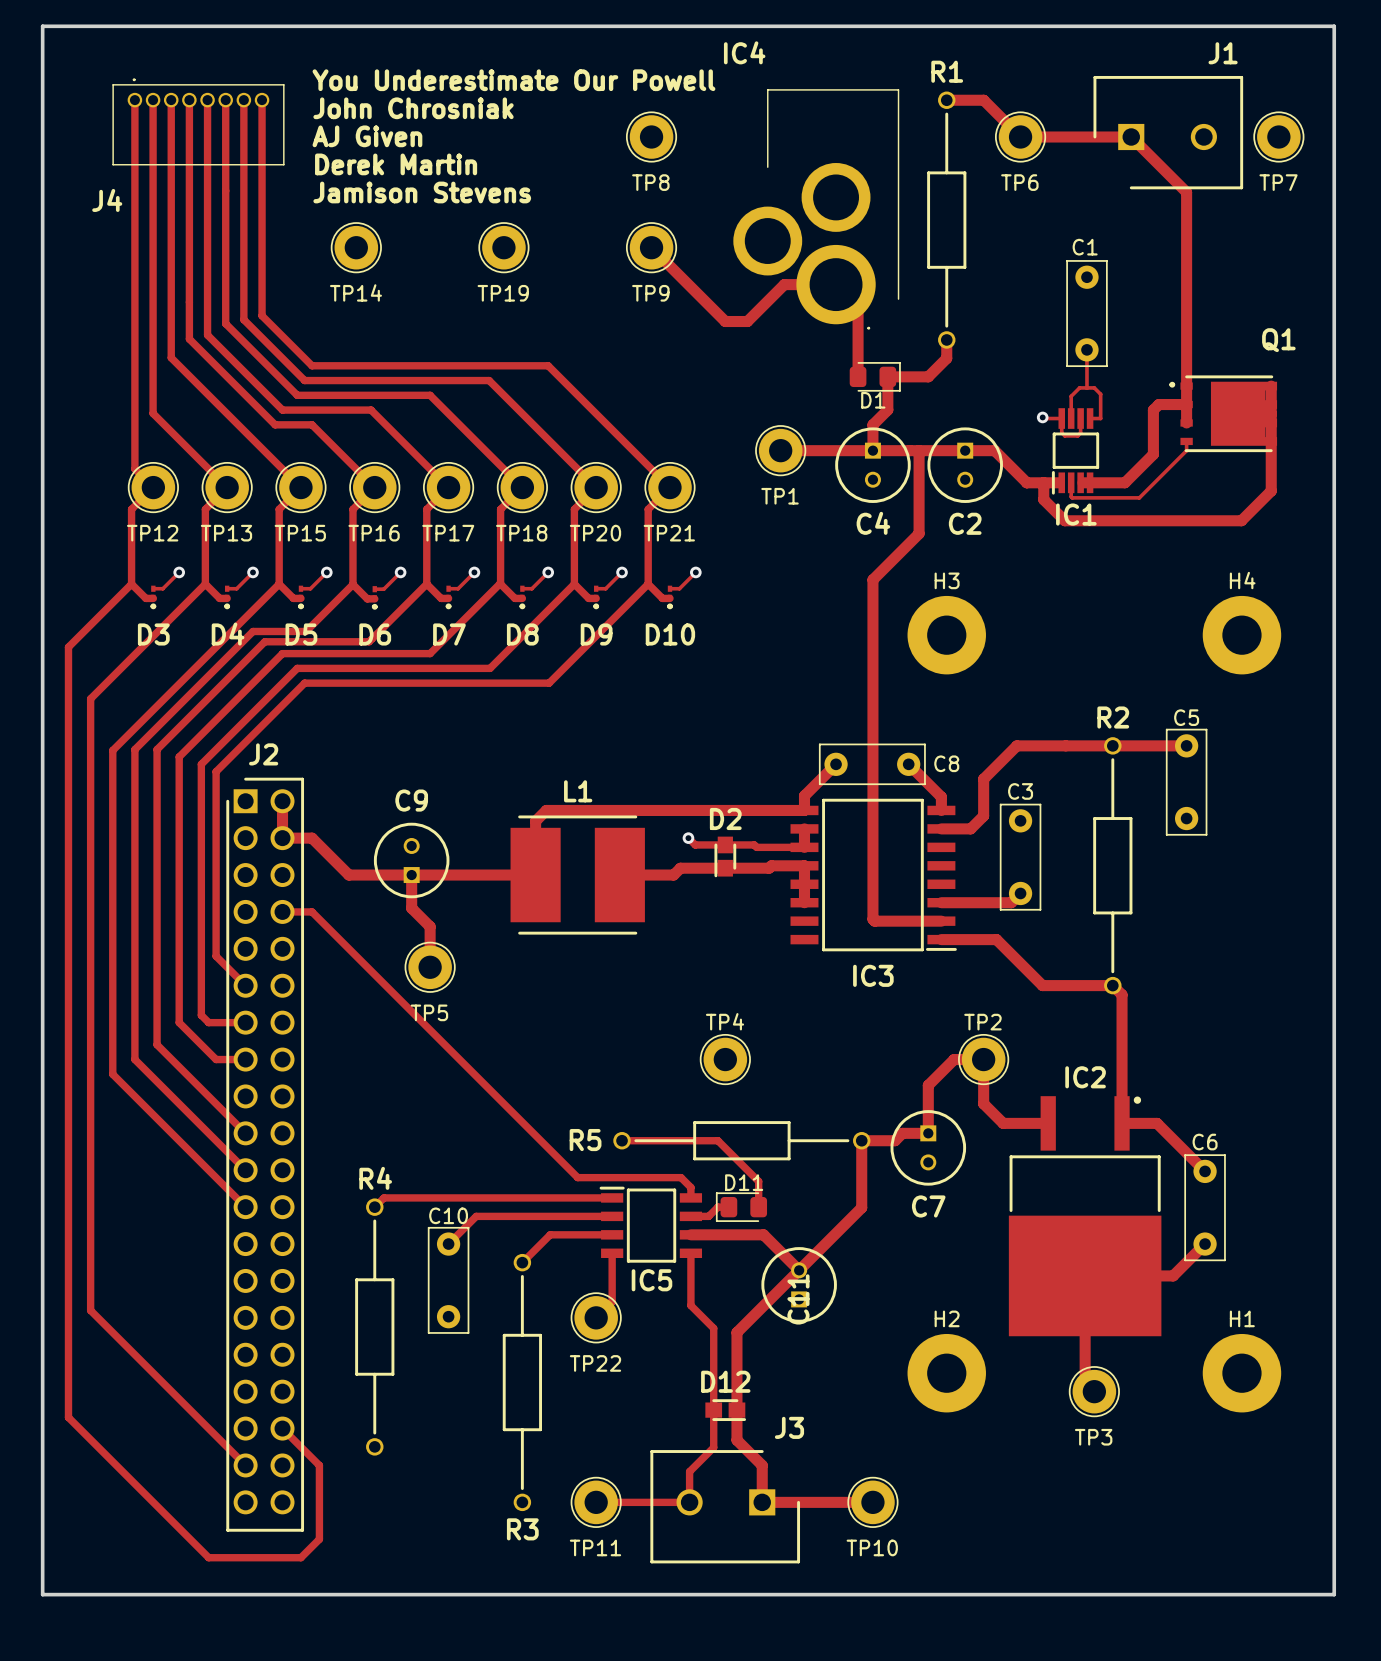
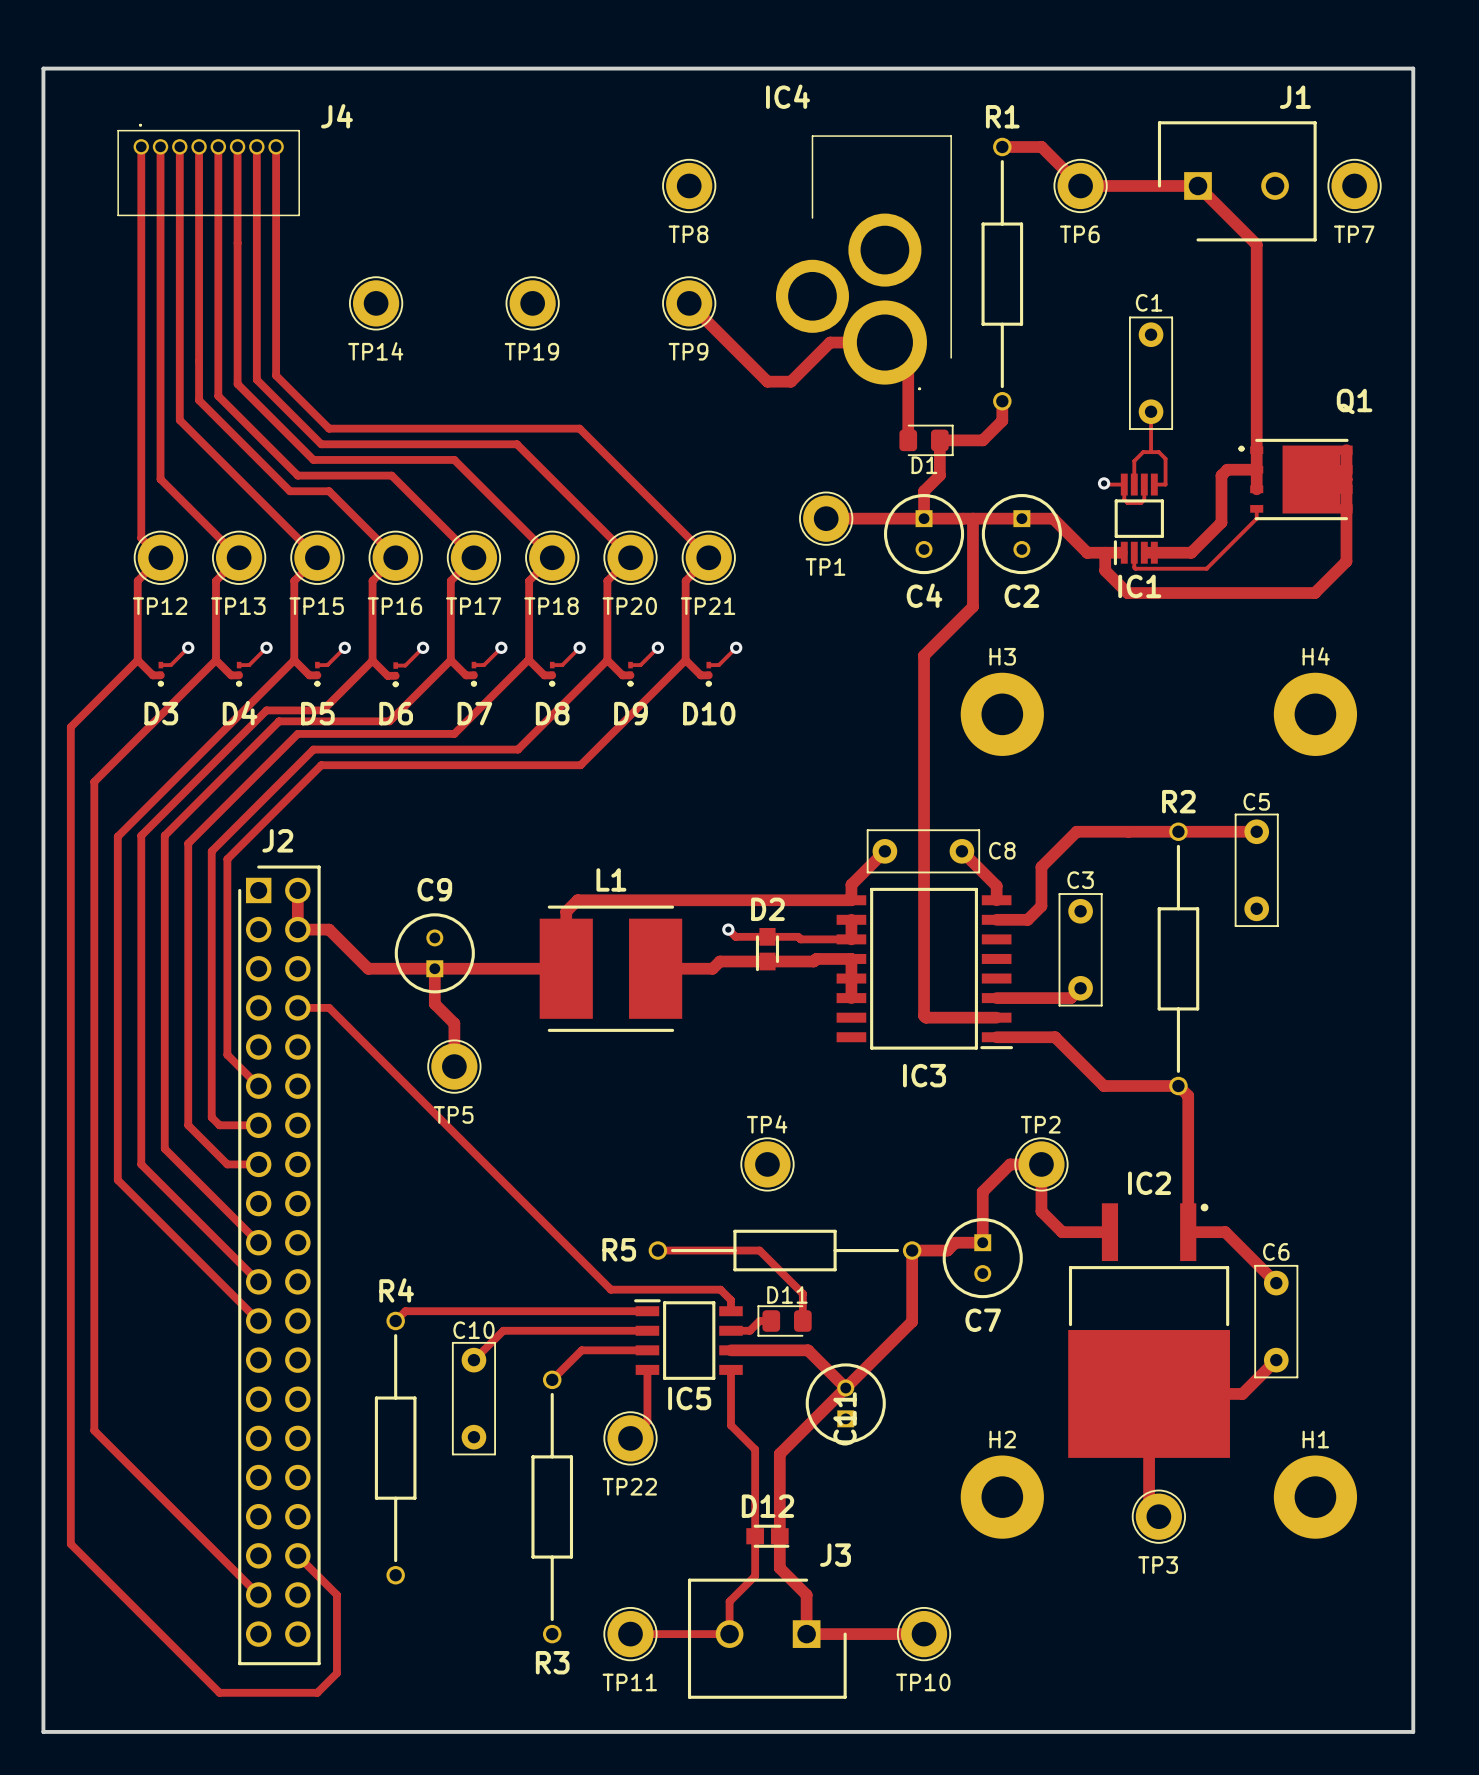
text: You Underestimate Our Powell (513, 80) -> none
text: John Chrosniak (413, 108) -> none
text: AJ Given (367, 136) -> none
text: Derek Martin (396, 164) -> none
text: Jamison Stevens (422, 192) -> none
J4 name position: J4 (107, 200) -> J4 (336, 116)

